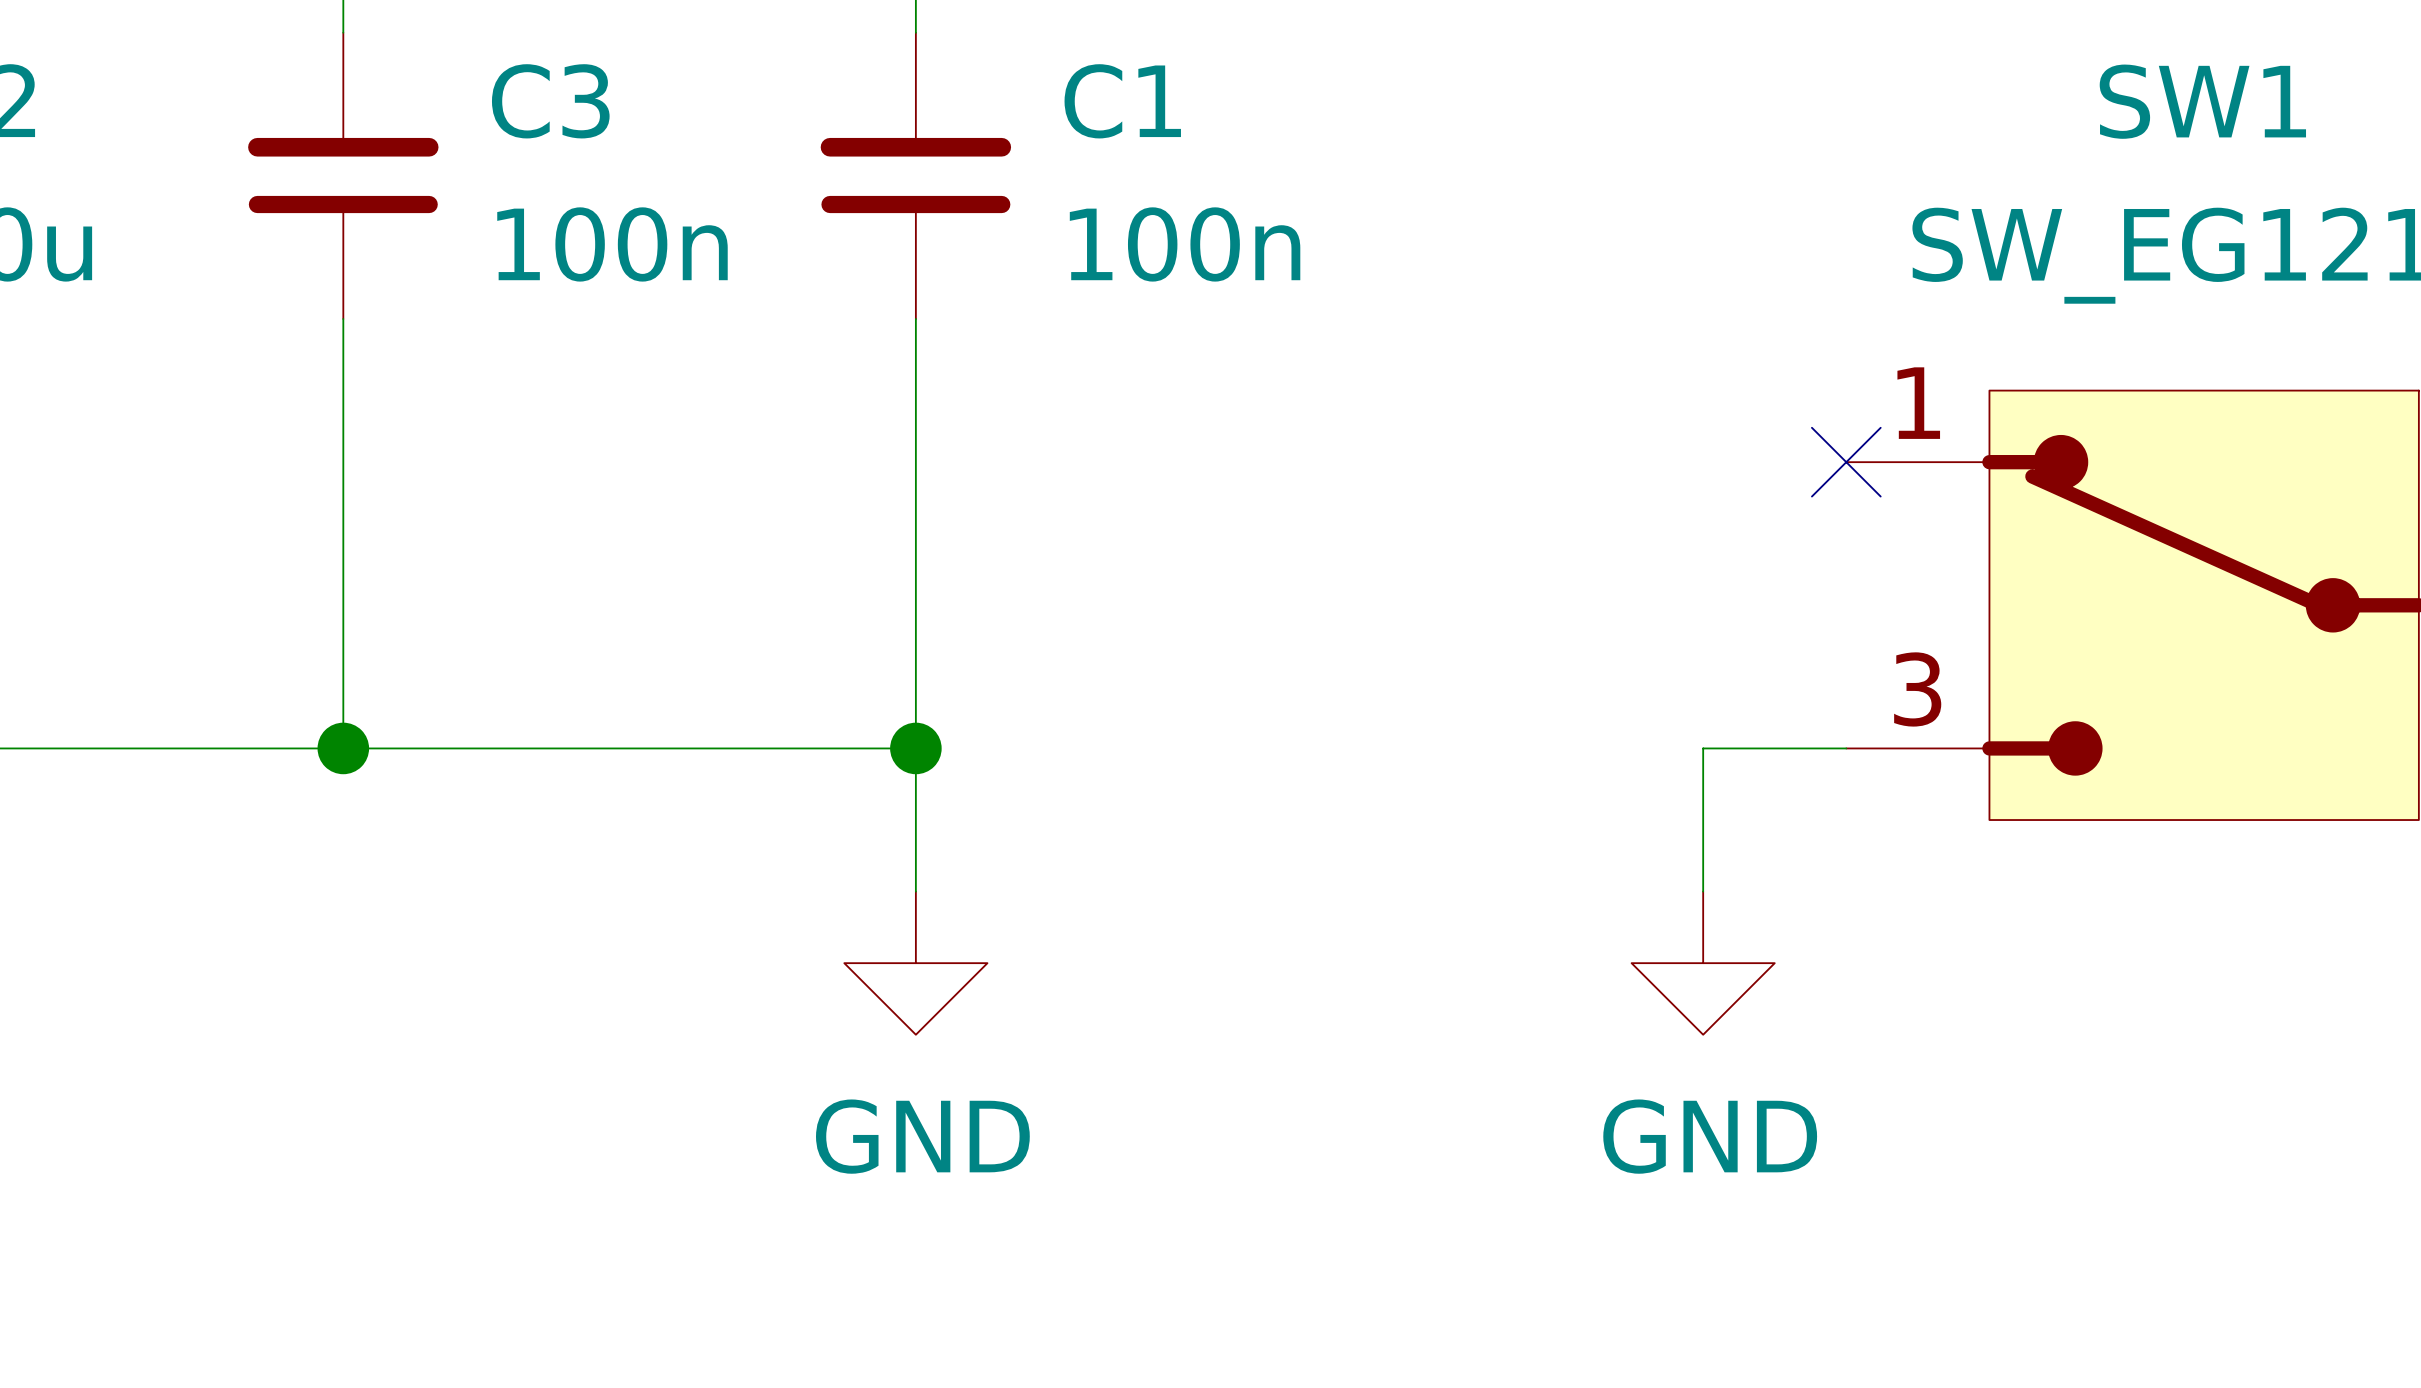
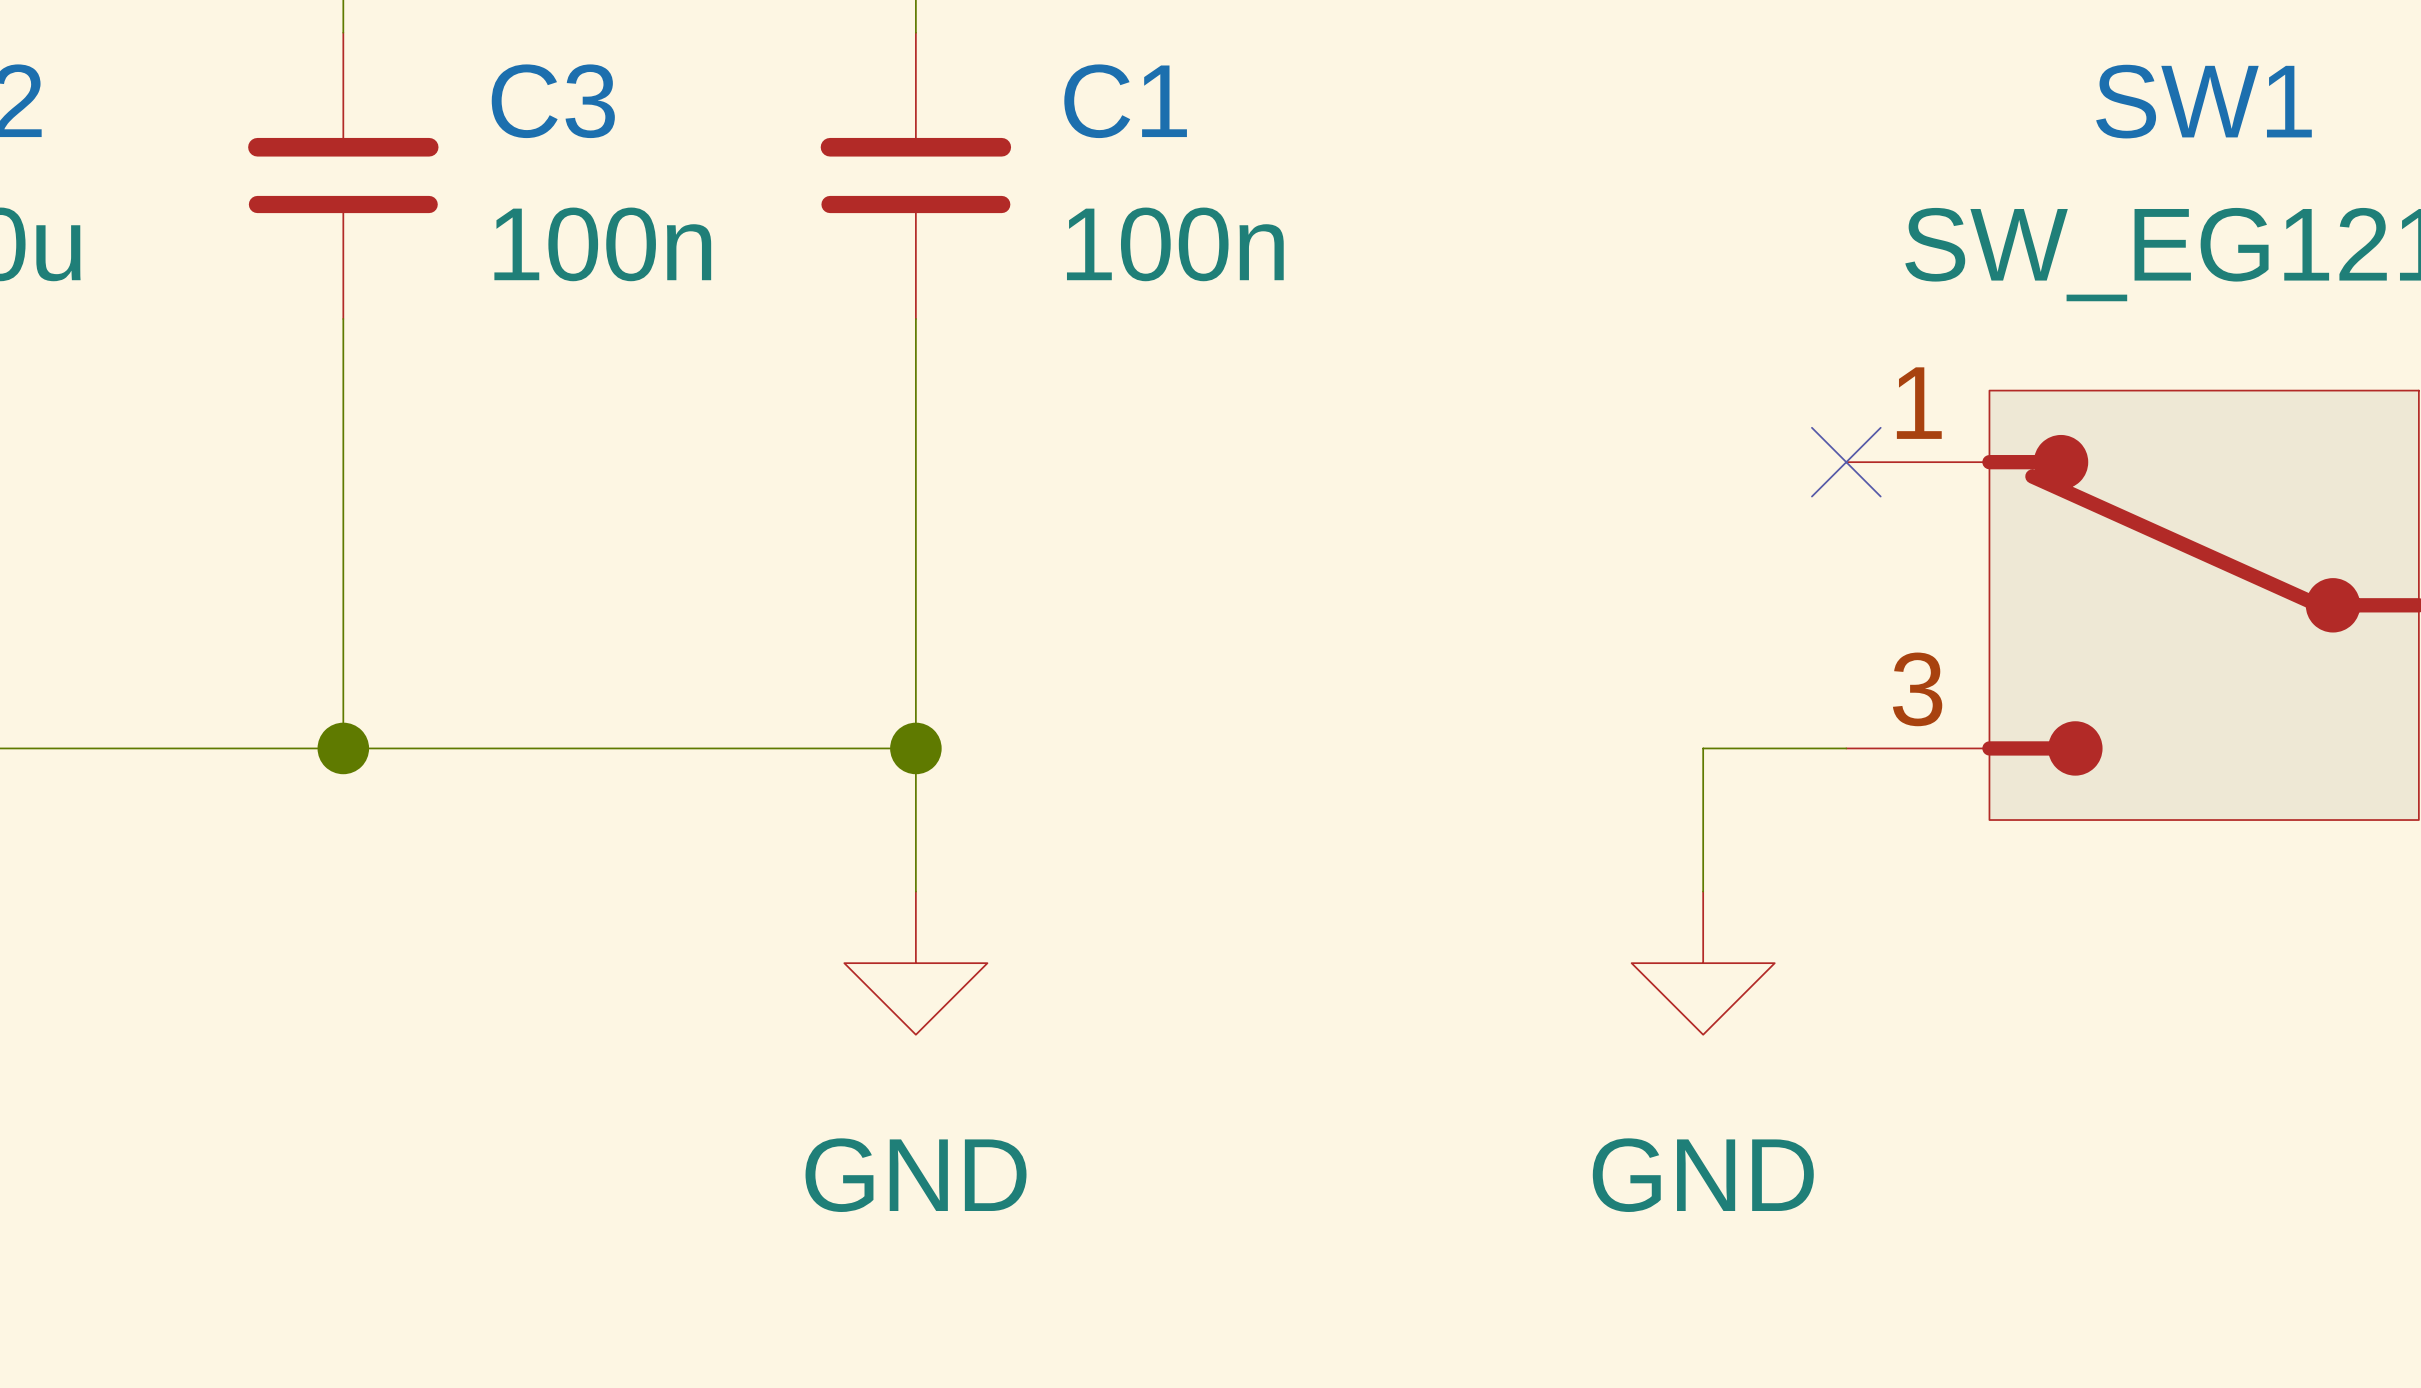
power symbol text position: GND (922, 1136) -> GND (916, 1175)
power symbol text position: GND (1710, 1136) -> GND (1703, 1175)

